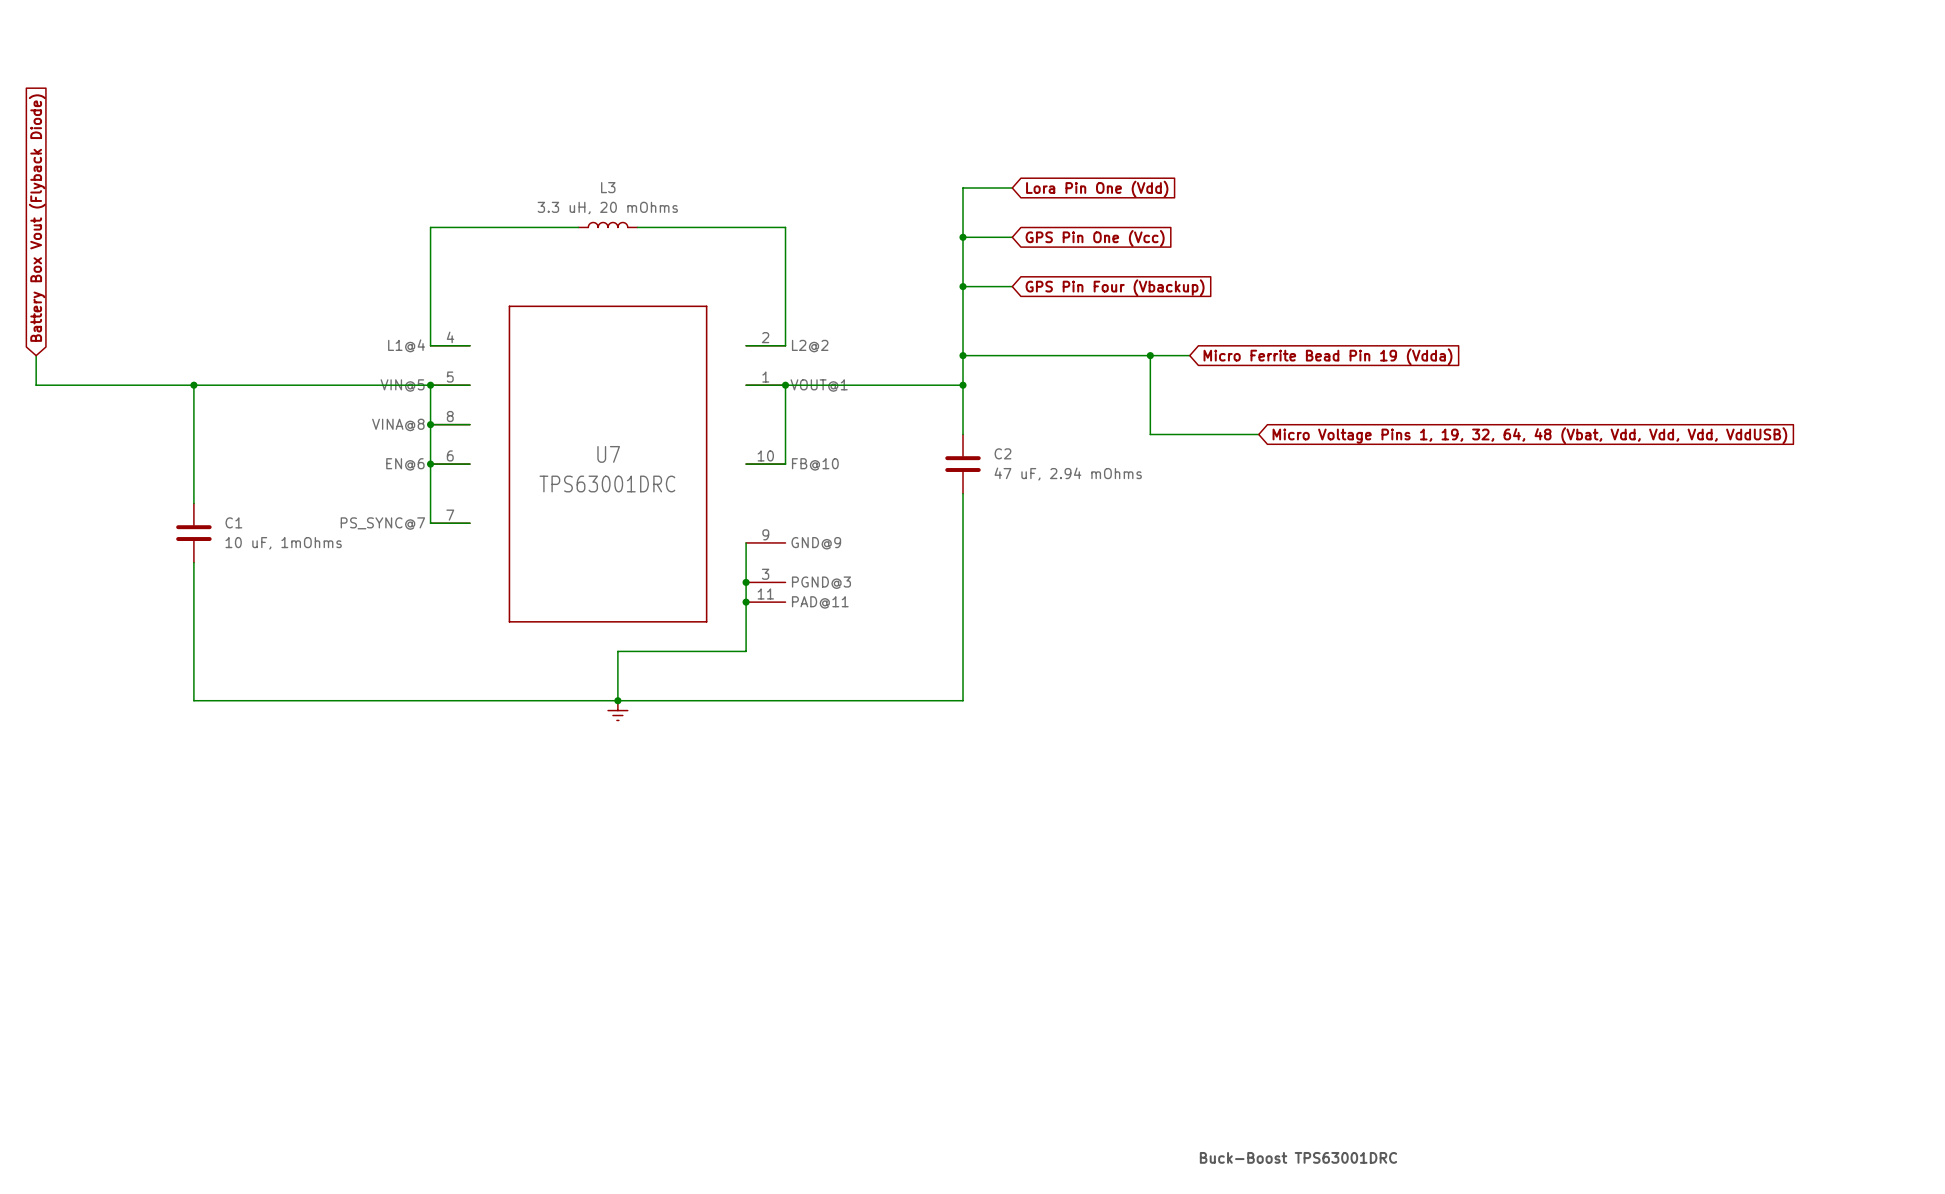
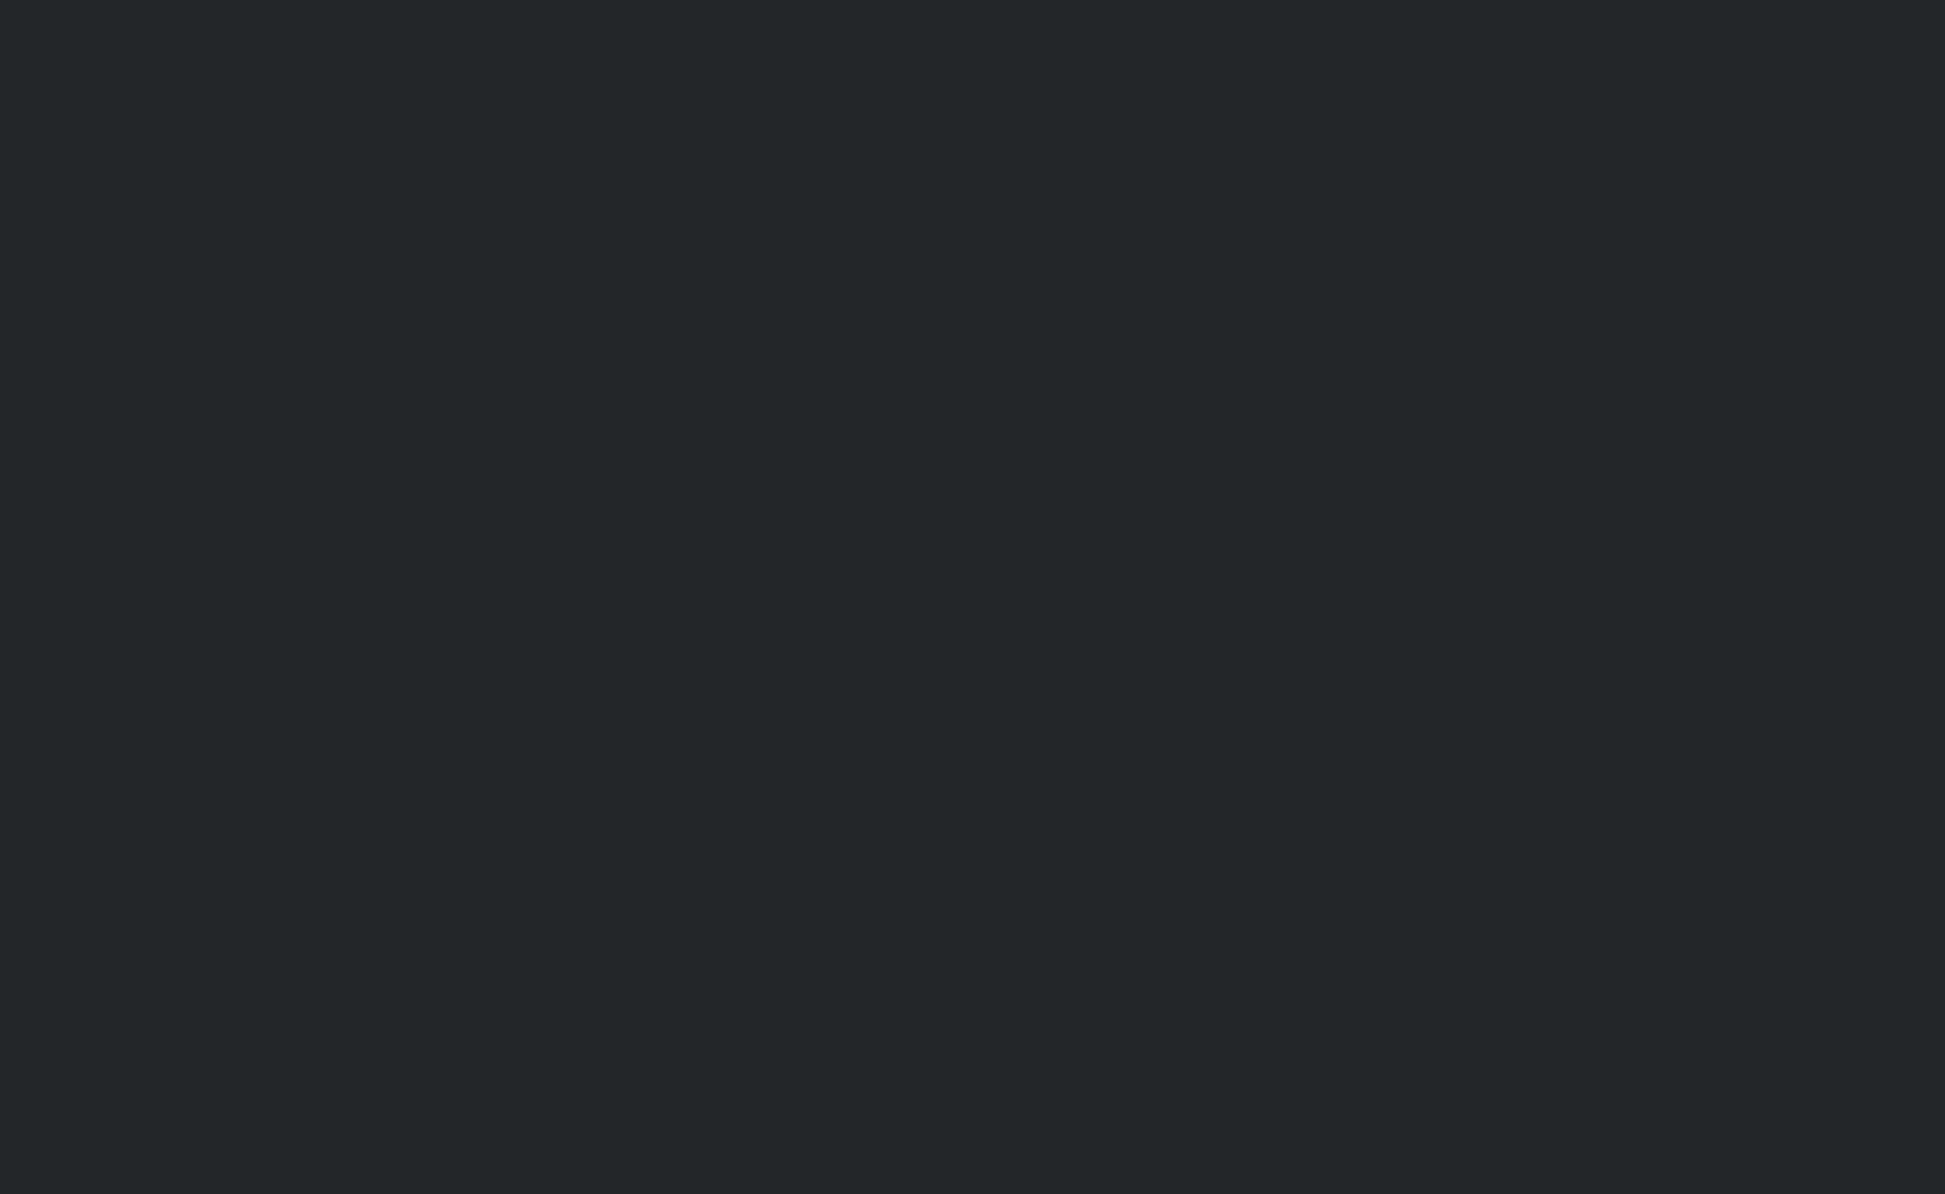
wire: (1012, 188) (963, 188) (963, 434) -> none
global label: Lora Pin One (Vdd) (1097, 189) -> none
global label: Battery Box Vout (Flyback Diode) (37, 218) -> none
L3: 3.3 uH, 20 mOhms (608, 224) -> none
wire: (578, 227) (430, 227) (430, 345) (469, 345) -> none
wire: (637, 227) (785, 227) (785, 345) (746, 345) -> none
wire: (963, 237) (1012, 237) -> none
junction: (963, 237) -> none
global label: GPS Pin One (Vcc) (1095, 238) -> none
wire: (963, 286) (1012, 286) -> none
junction: (963, 286) -> none
global label: GPS Pin Four (Vbackup) (1115, 287) -> none
wire: (36, 355) (36, 385) (469, 385) -> none
wire: (963, 355) (1189, 355) -> none
junction: (963, 355) -> none
wire: (1150, 355) (1150, 434) (1258, 434) -> none
junction: (1150, 355) -> none
global label: Micro Ferrite Bead Pin 19 (Vdda) (1328, 356) -> none
wire: (193, 385) (193, 503) -> none
junction: (193, 385) -> none
wire: (430, 385) (430, 523) (469, 523) -> none
junction: (430, 385) -> none
wire: (746, 385) (963, 385) -> none
wire: (785, 385) (785, 464) (746, 464) -> none
junction: (785, 385) -> none
junction: (963, 385) -> none
wire: (430, 424) (469, 424) -> none
junction: (430, 424) -> none
global label: Micro Voltage Pins 1, 19, 32, 64, 48 (Vbat, Vdd, Vdd, Vdd, VddUSB) (1529, 435) -> none
wire: (430, 464) (469, 464) -> none
junction: (430, 464) -> none
U7: TPS63001DRC (608, 464) -> none
C2: 47 uF, 2.94 mOhms (963, 464) -> none
wire: (963, 493) (963, 700) (193, 700) (193, 562) -> none
C1: 10 uF, 1mOhms (193, 533) -> none
wire: (746, 542) (746, 651) (617, 651) (617, 700) -> none
junction: (746, 582) -> none
junction: (746, 602) -> none
junction: (617, 700) -> none
power symbol: (617, 710) -> none
text: Buck-Boost TPS63001DRC (1298, 1157) -> none

